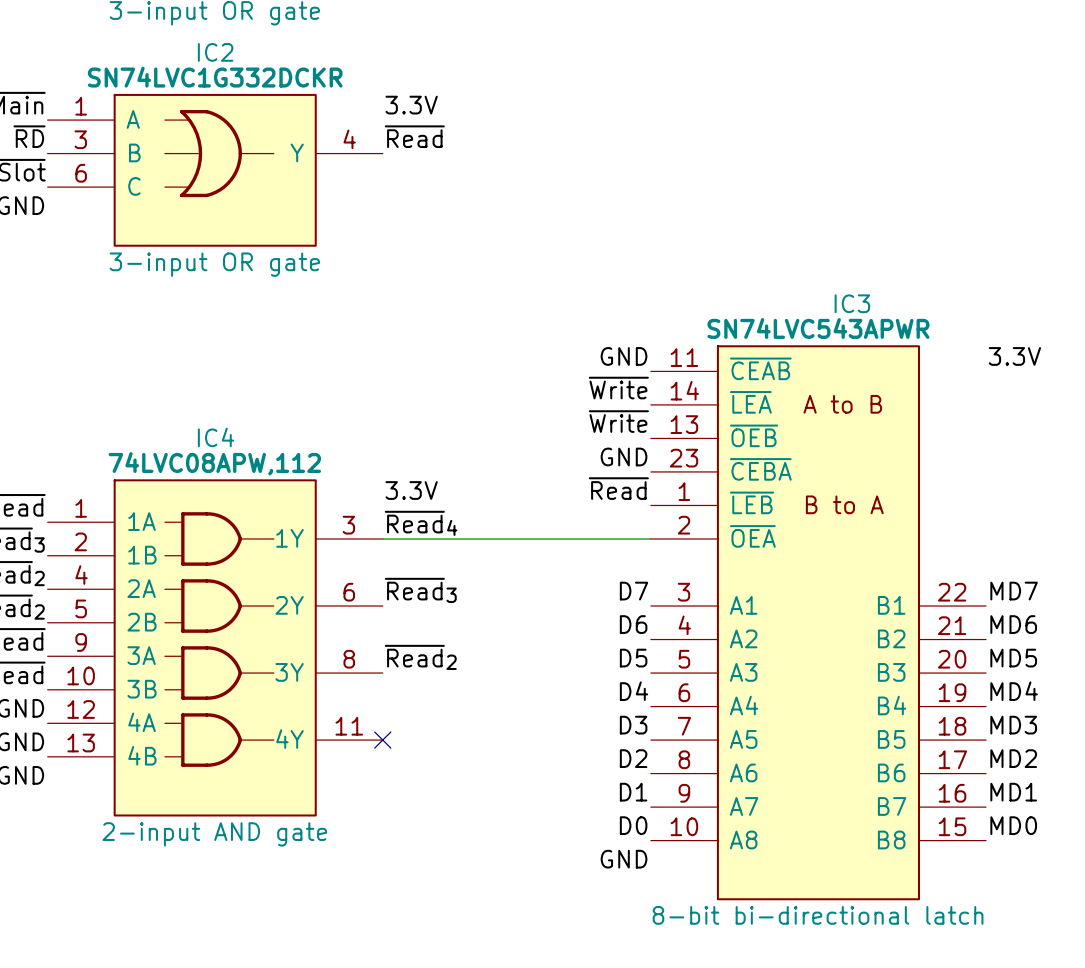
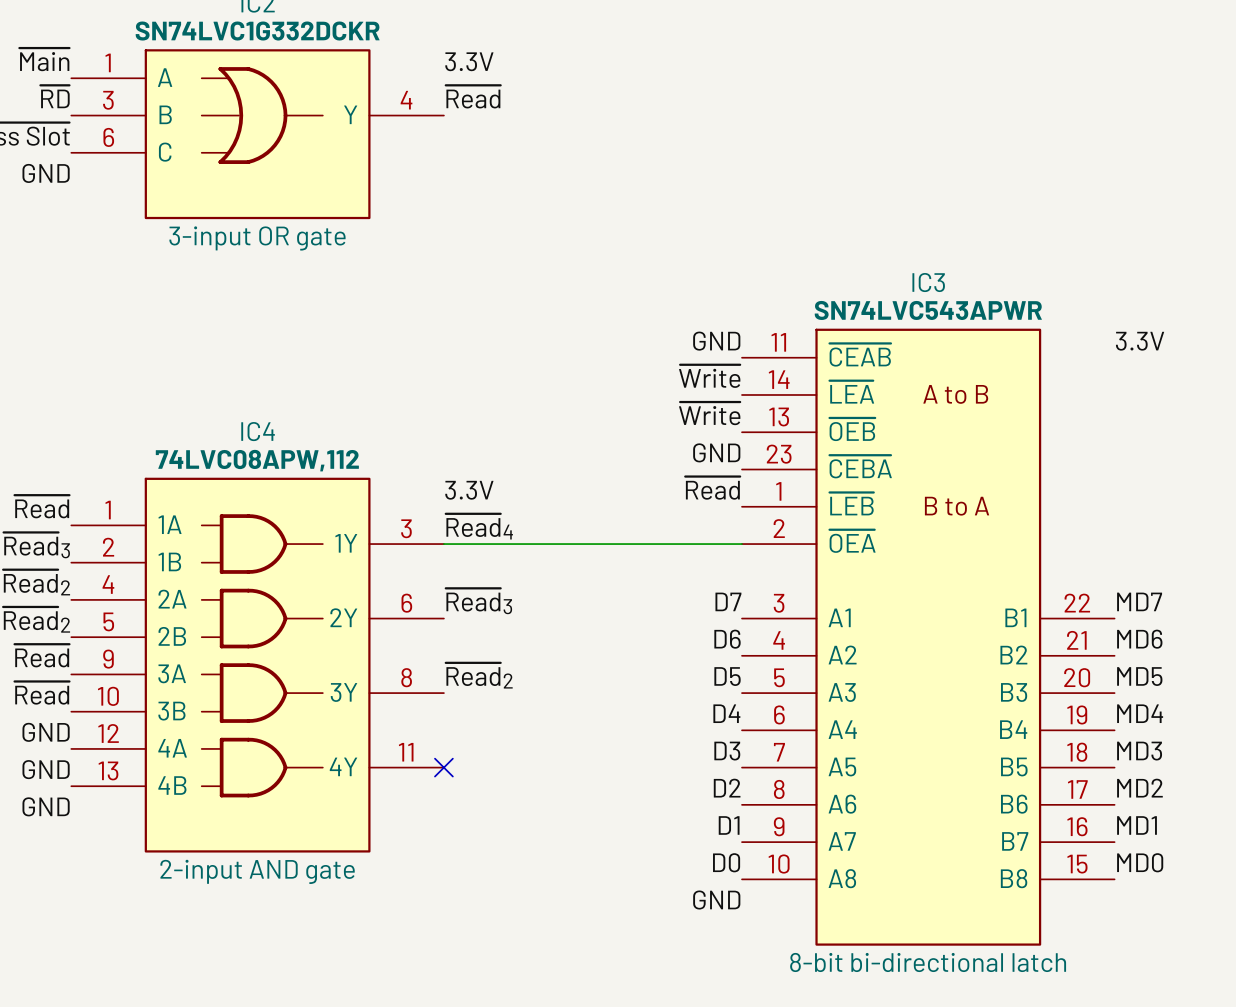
IC3 name position: IC3 (852, 303) -> IC3 (928, 282)

